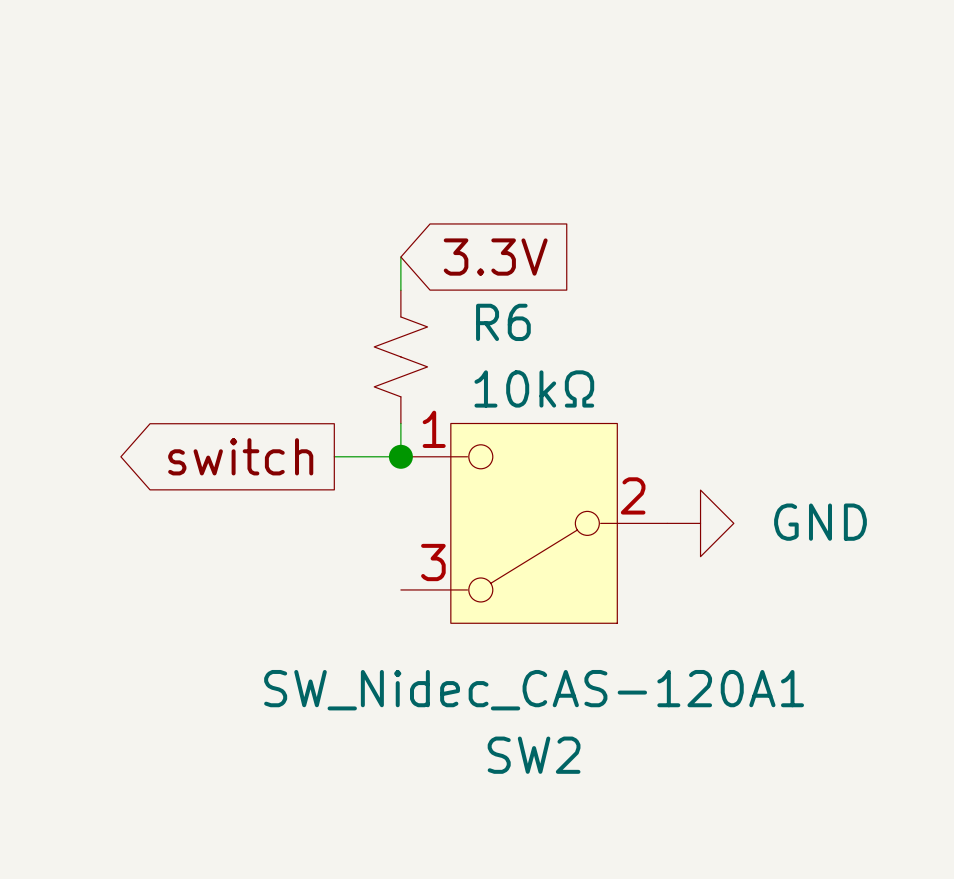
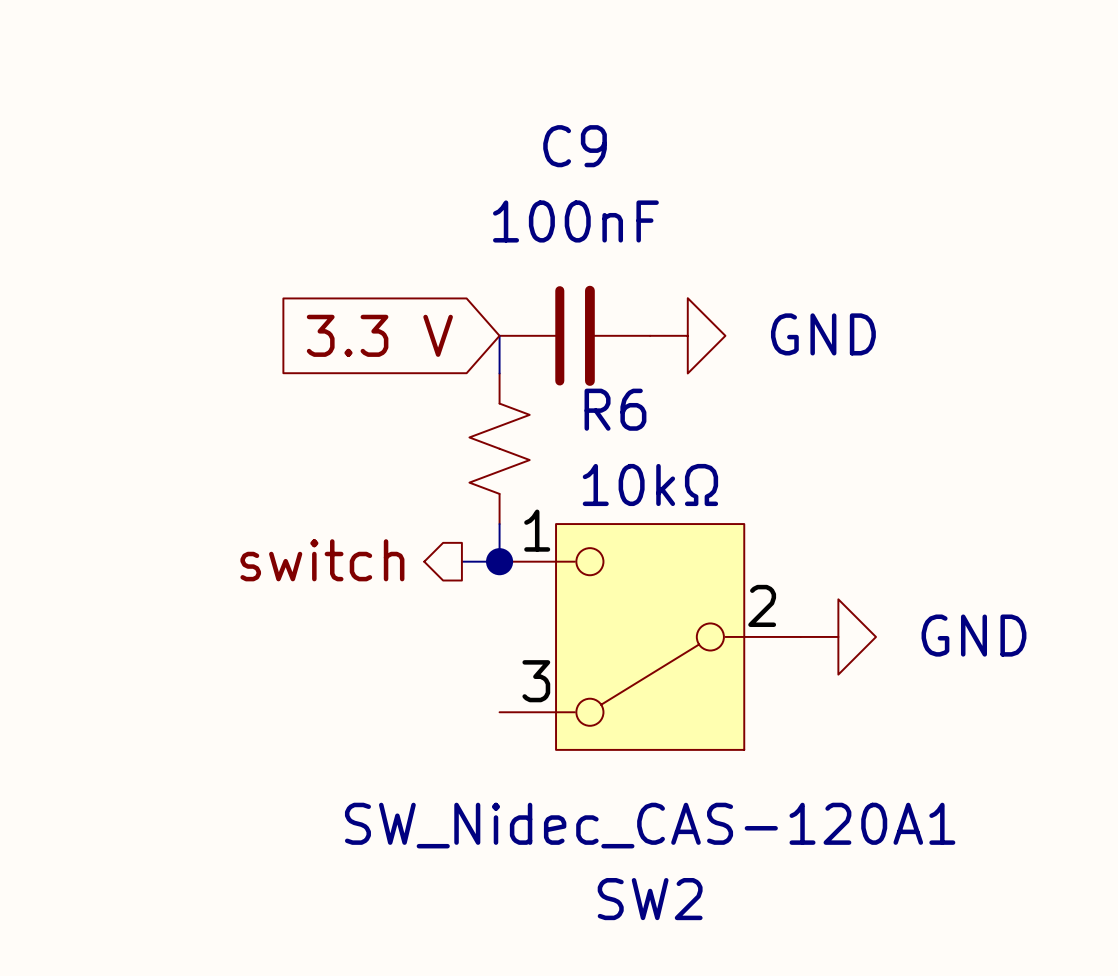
C9: none -> 100nF (574, 335)
global label: 3.3V (495, 257) -> 3.3 V (379, 335)
power symbol: none -> GND (687, 335)
hierarchical label: none -> switch (322, 560)
global label: switch (240, 456) -> none
wire: (334, 456) (367, 456) -> none

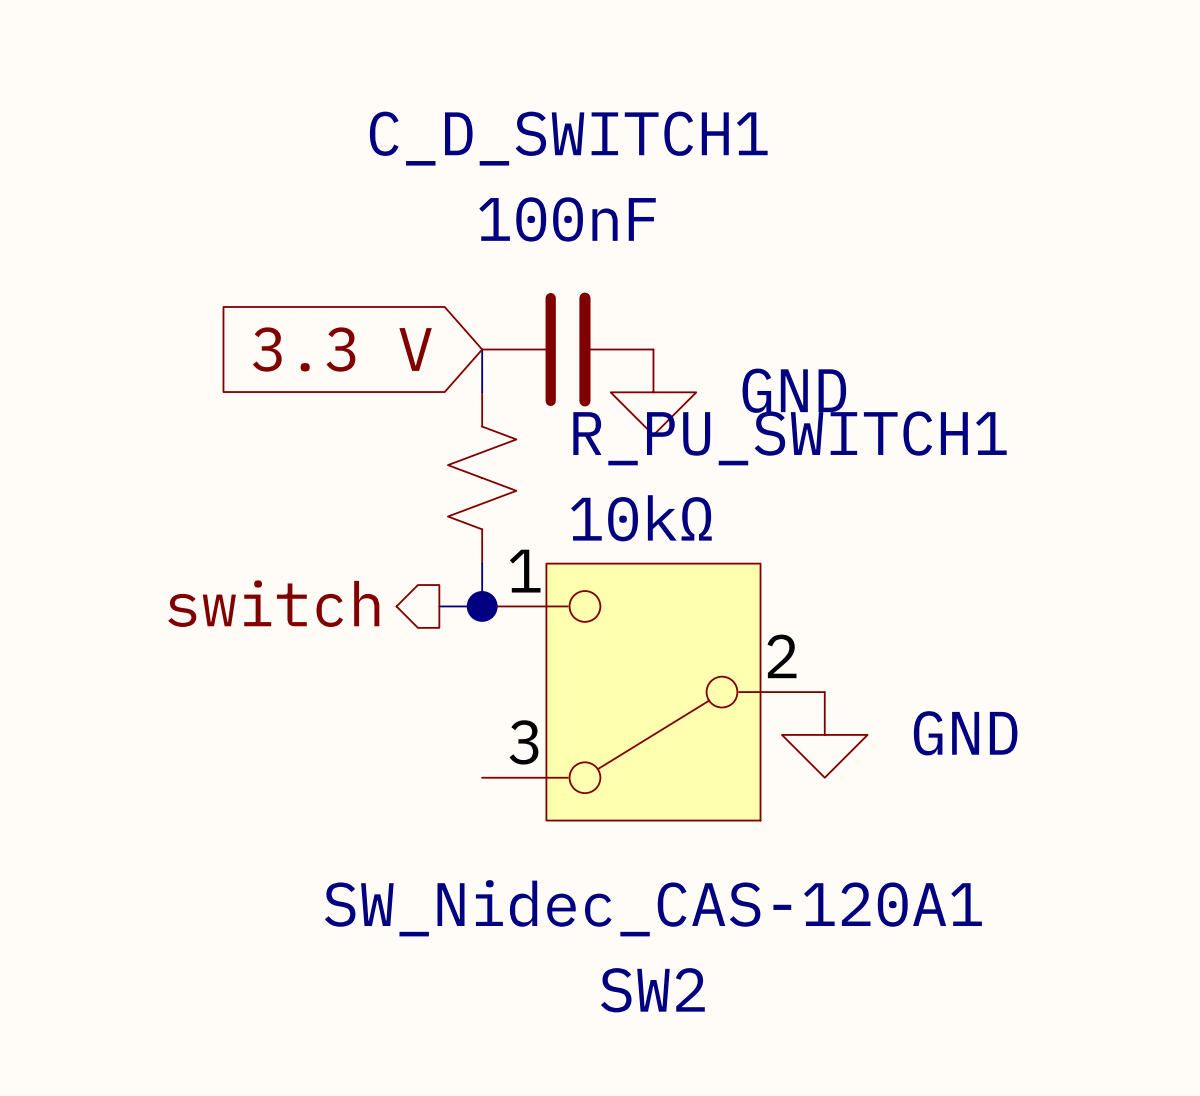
C9 name: C9 (575, 146) -> C_D_SWITCH1 (568, 138)
power symbol rotation: 0° (687, 335) -> 90° clockwise (653, 392)
power symbol position: GND (687, 335) -> GND (653, 392)
R6 name: R6 (615, 409) -> R_PU_SWITCH1 (790, 438)
power symbol rotation: 0° (838, 636) -> 90° clockwise (824, 734)
power symbol position: GND (838, 636) -> GND (824, 734)

